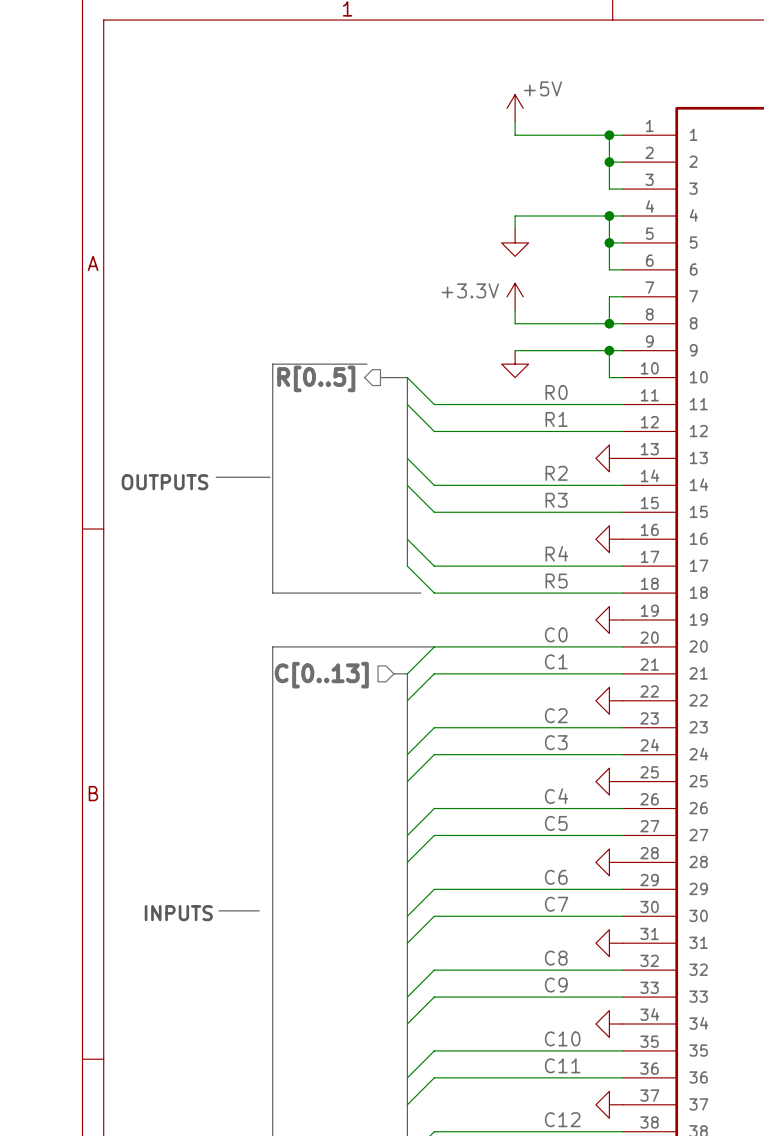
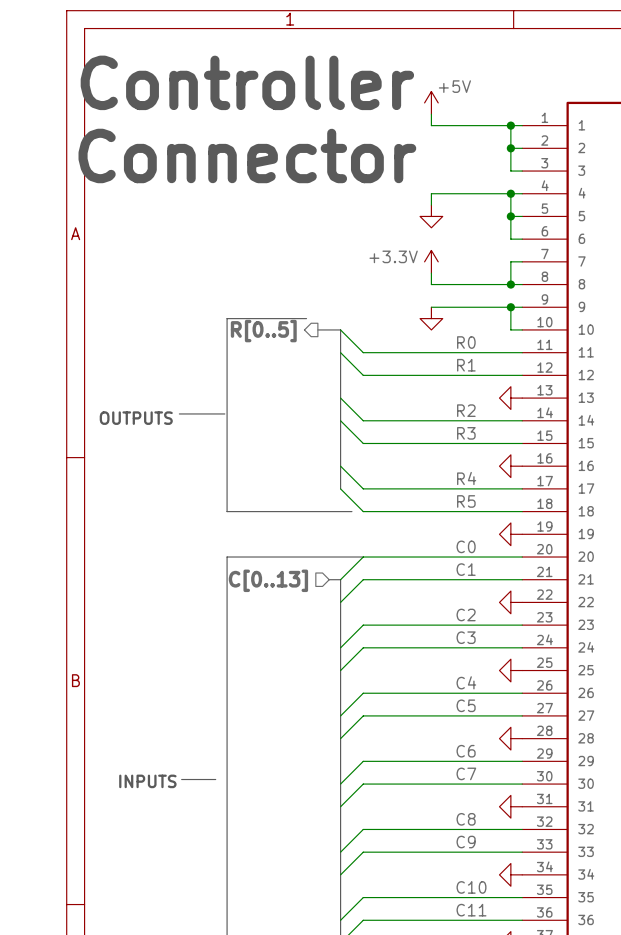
text: none -> Controller (247, 82)
text: none -> Connector (247, 155)

